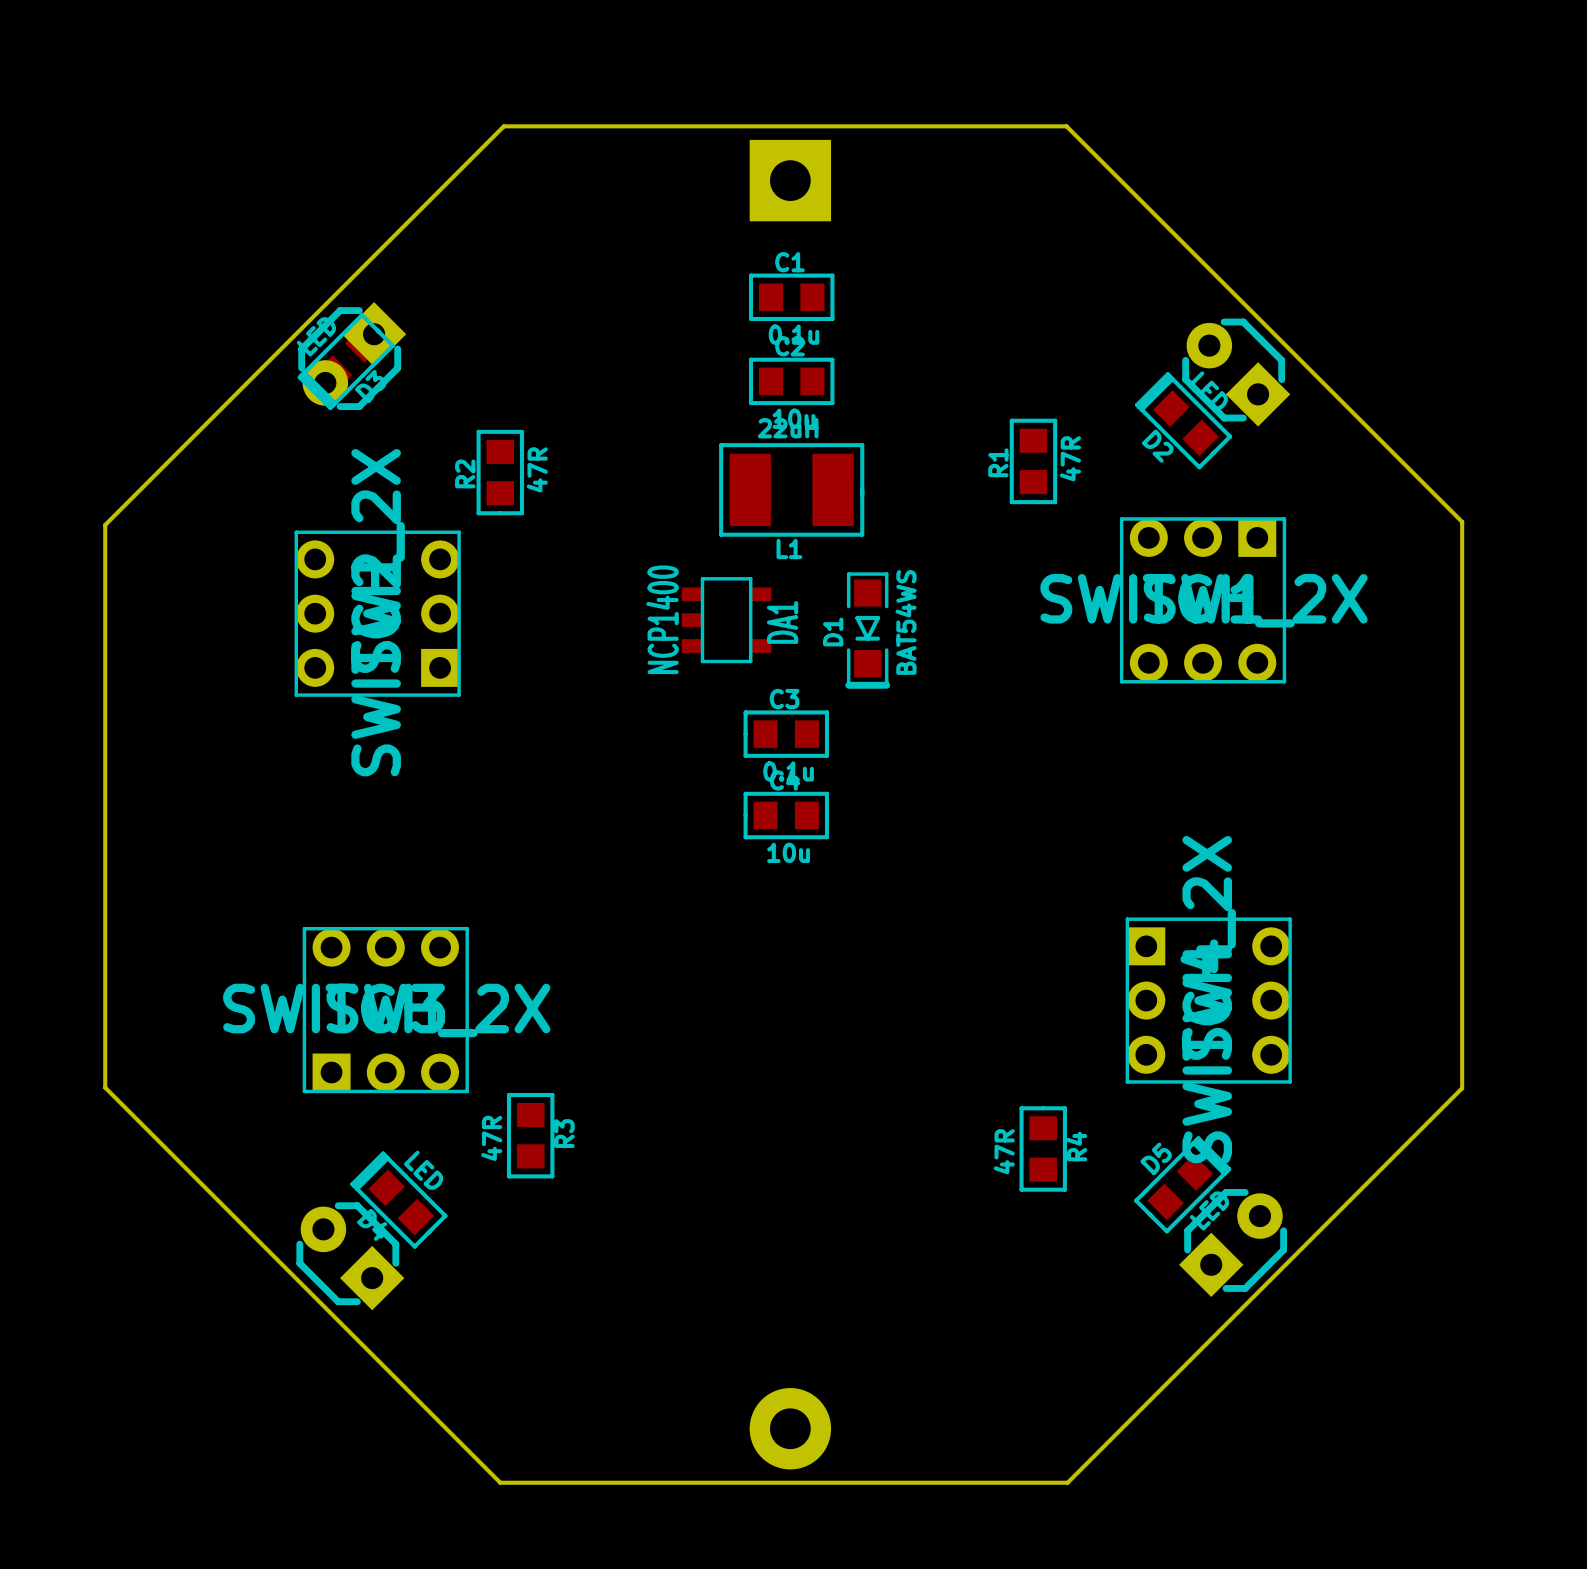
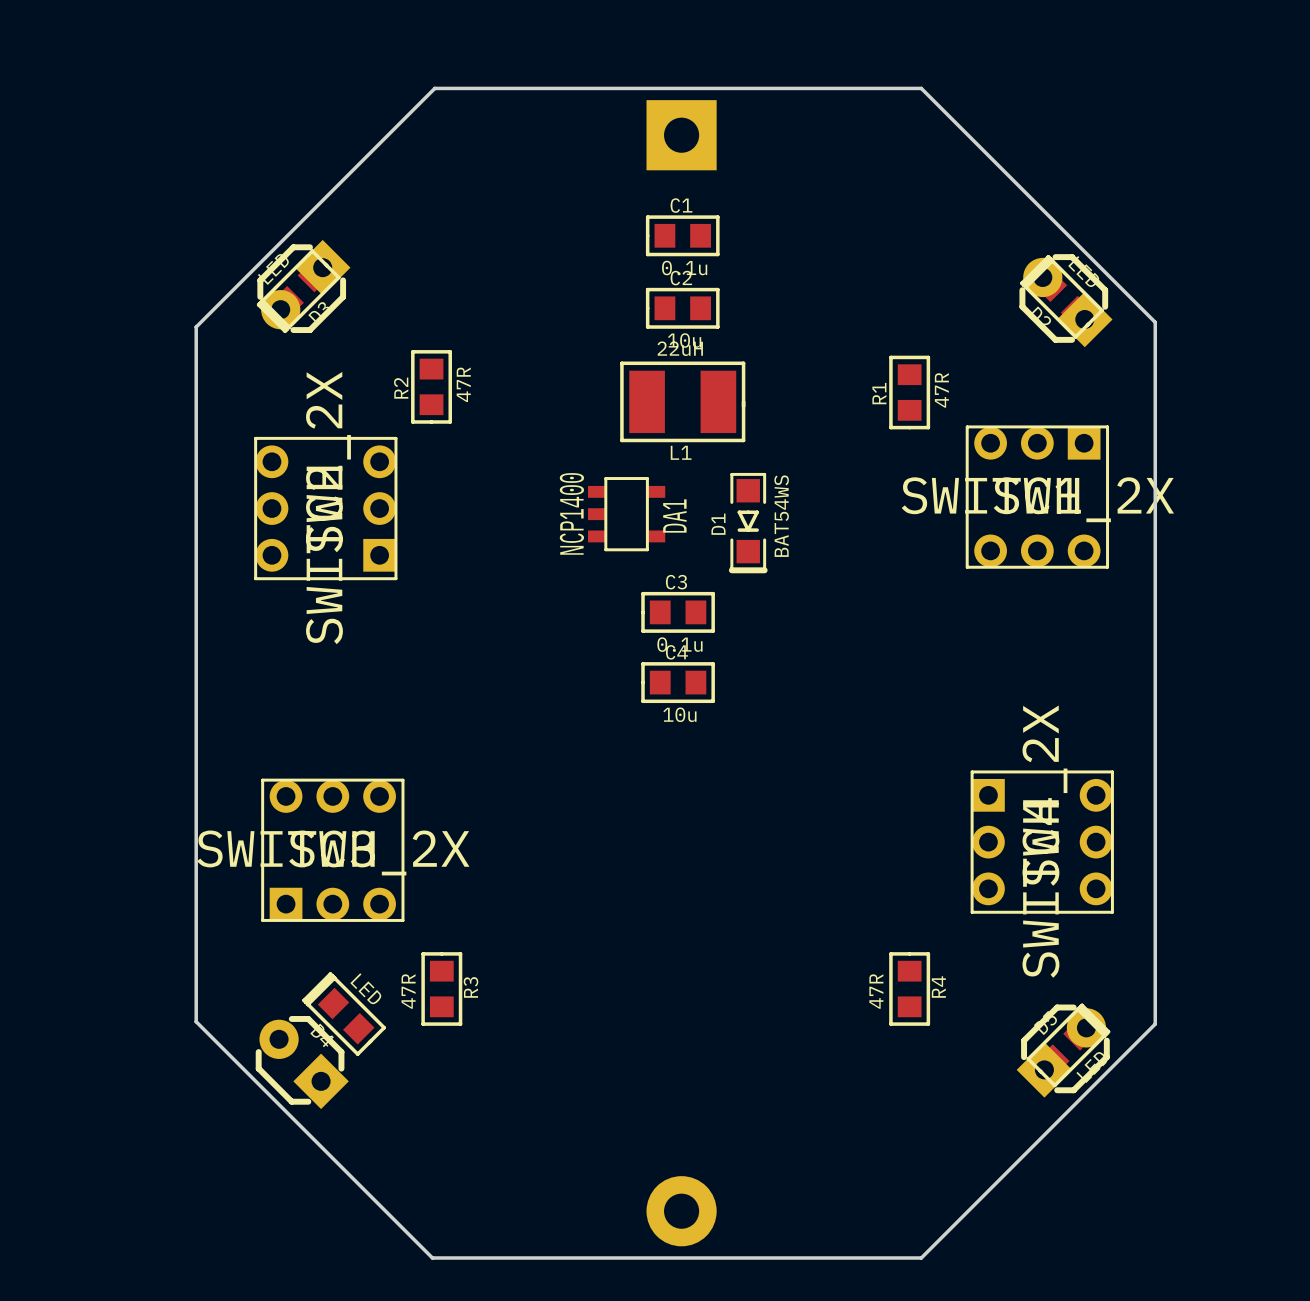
board edge: (503, 126) (105, 524) (105, 1087) (500, 1482) -> none
board edge: (1066, 126) (1462, 521) (1462, 1088) (1067, 1482) (500, 1482) -> (919, 88) (1155, 322) (1155, 1024) (921, 1258) (432, 1258) (196, 1021) (196, 327) (434, 88)
D2 position: (1183, 420) -> (1061, 296)
R1 position: (1033, 461) -> (909, 392)
R3 position: (530, 1135) -> (441, 989)
R4 position: (1043, 1148) -> (909, 989)
D5 position: (1182, 1184) -> (1068, 1045)

